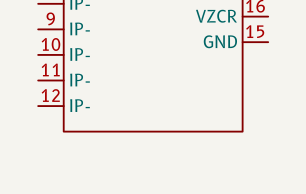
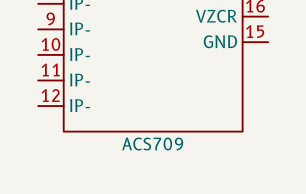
part value: none -> ACS709 (152, 143)

